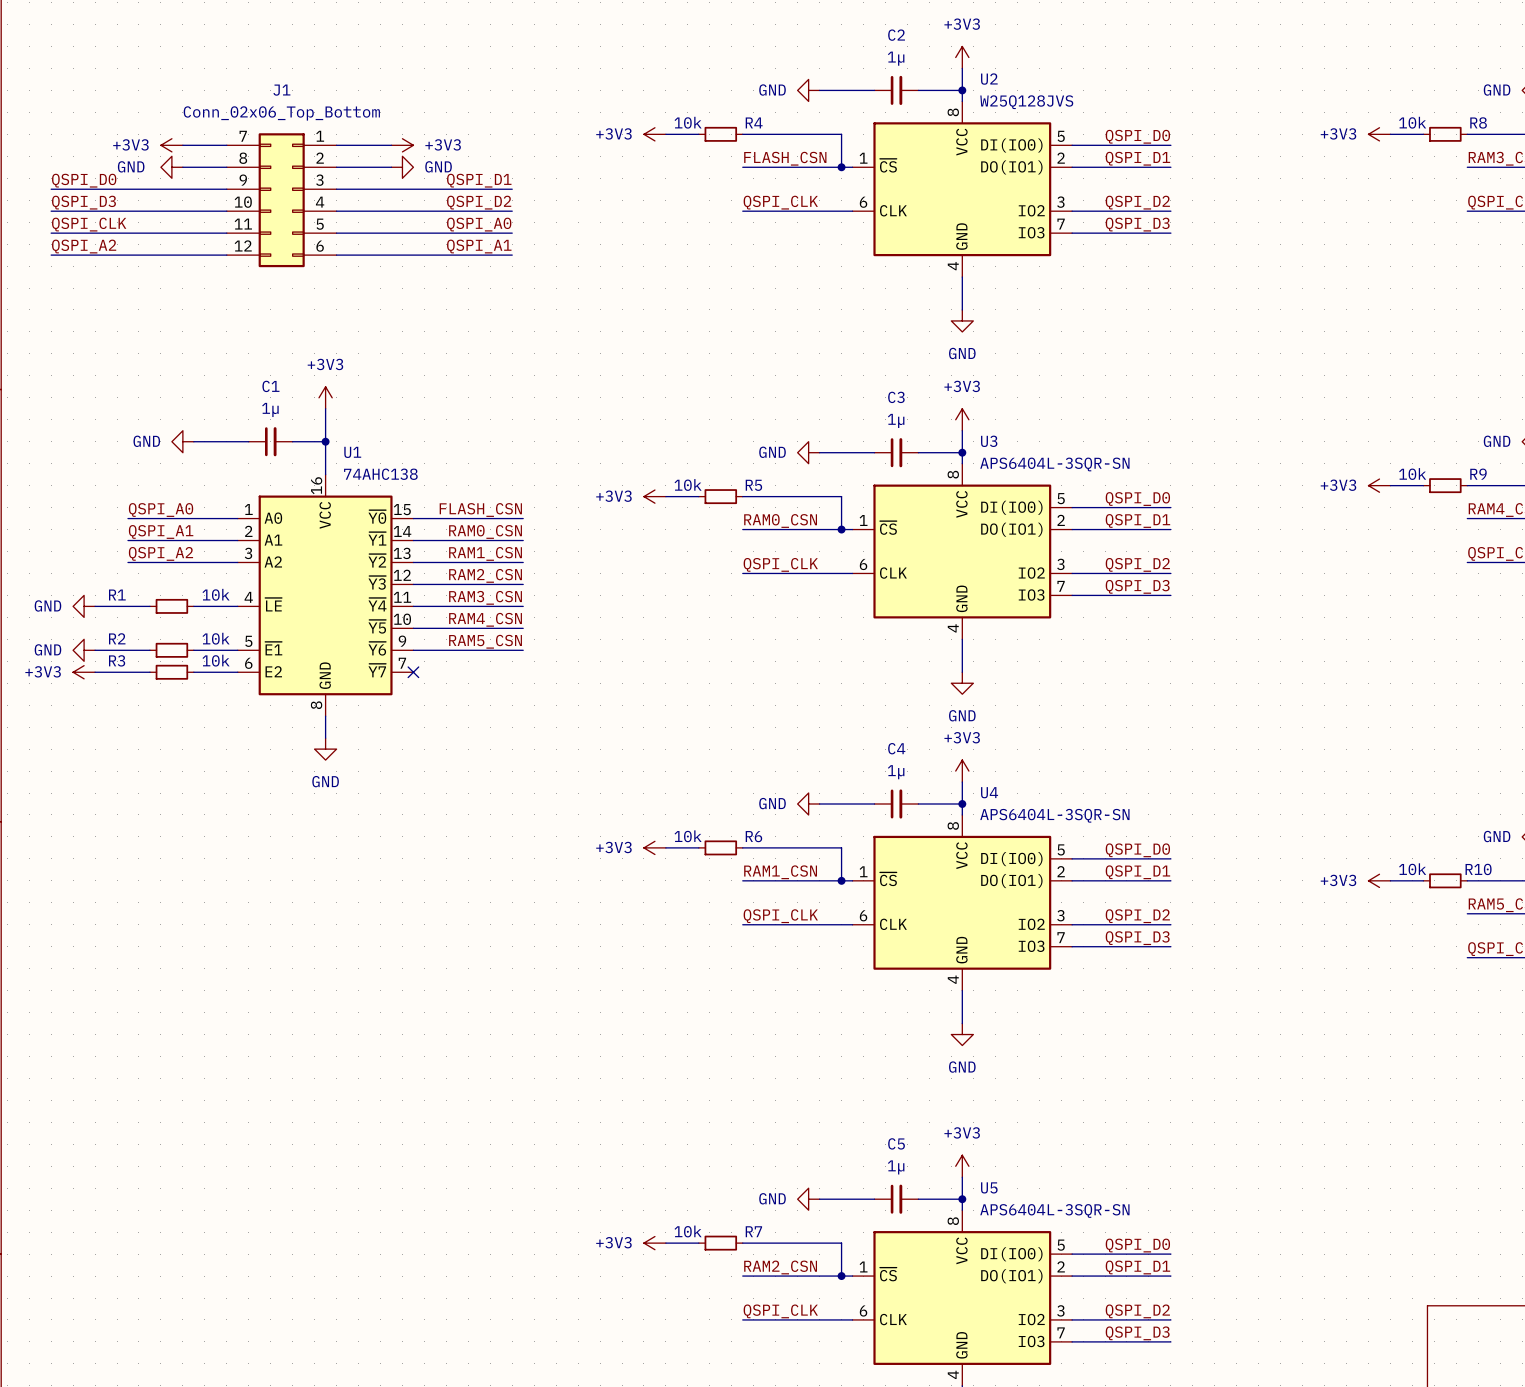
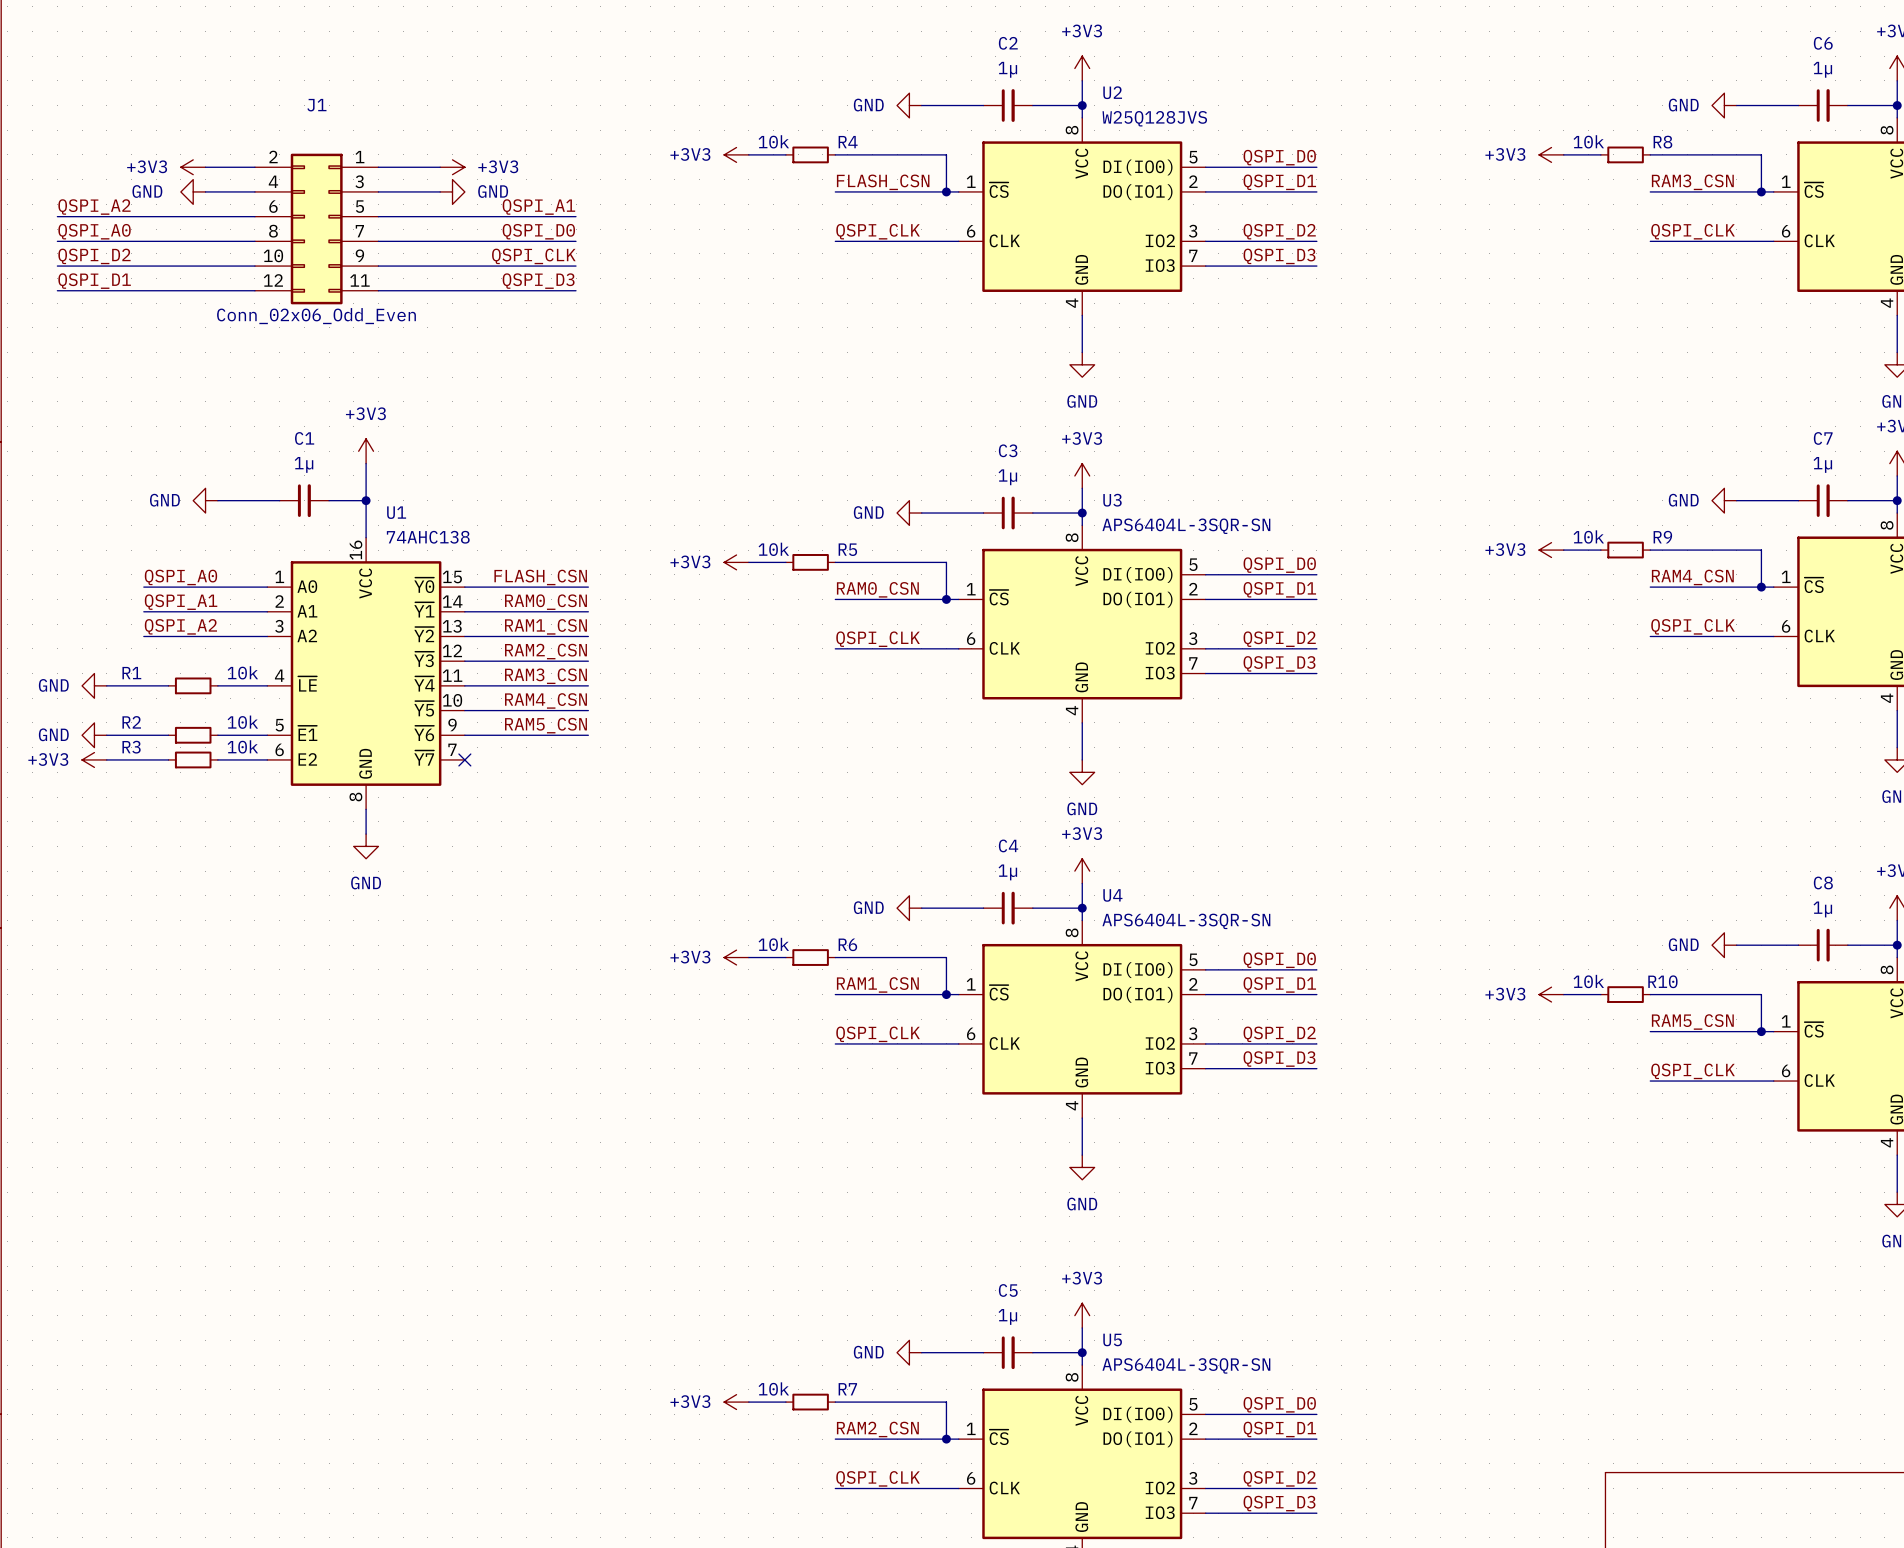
J1 value: Conn_02x06_Top_Bottom (281, 113) -> Conn_02x06_Odd_Even (316, 316)
J1 symbol: [226, 133, 337, 268] -> [254, 153, 379, 305]
label: QSPI_D0 (84, 180) -> QSPI_A2 (94, 207)
label: QSPI_D1 (479, 180) -> QSPI_A1 (538, 207)
label: QSPI_D3 (83, 202) -> QSPI_A0 (94, 231)
label: QSPI_D2 (479, 202) -> QSPI_D0 (538, 231)
label: QSPI_CLK (89, 224) -> QSPI_D2 (94, 256)
label: QSPI_A0 (479, 224) -> QSPI_CLK (533, 256)
label: QSPI_A2 (84, 246) -> QSPI_D1 (94, 281)
label: QSPI_A1 (479, 246) -> QSPI_D3 (538, 281)

